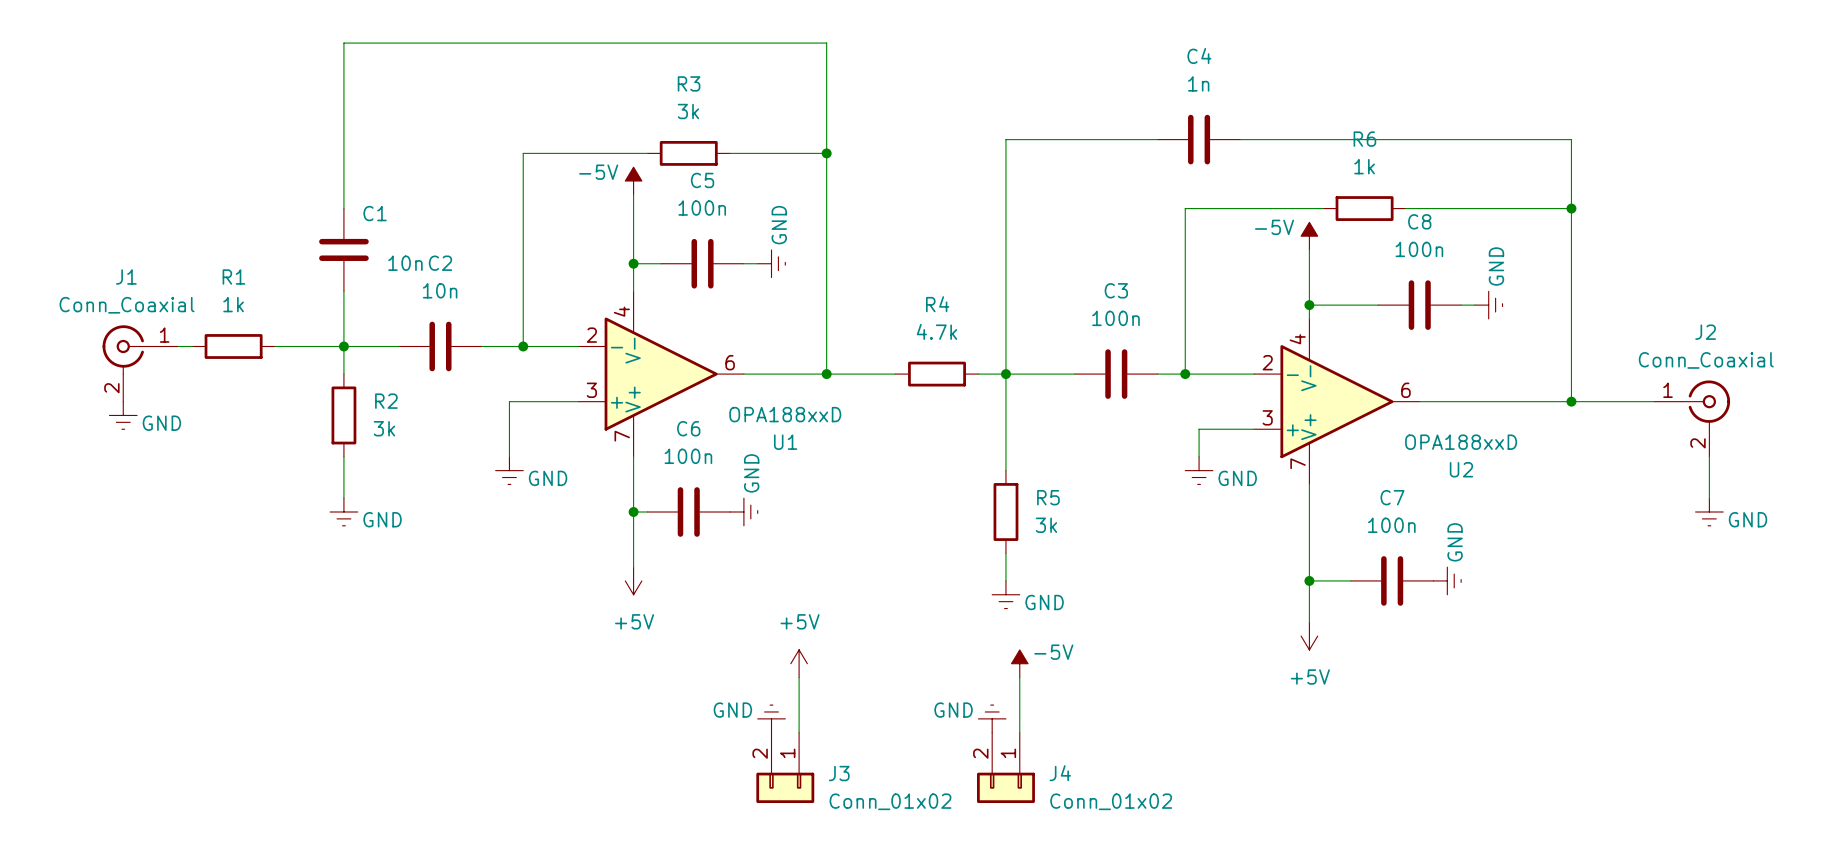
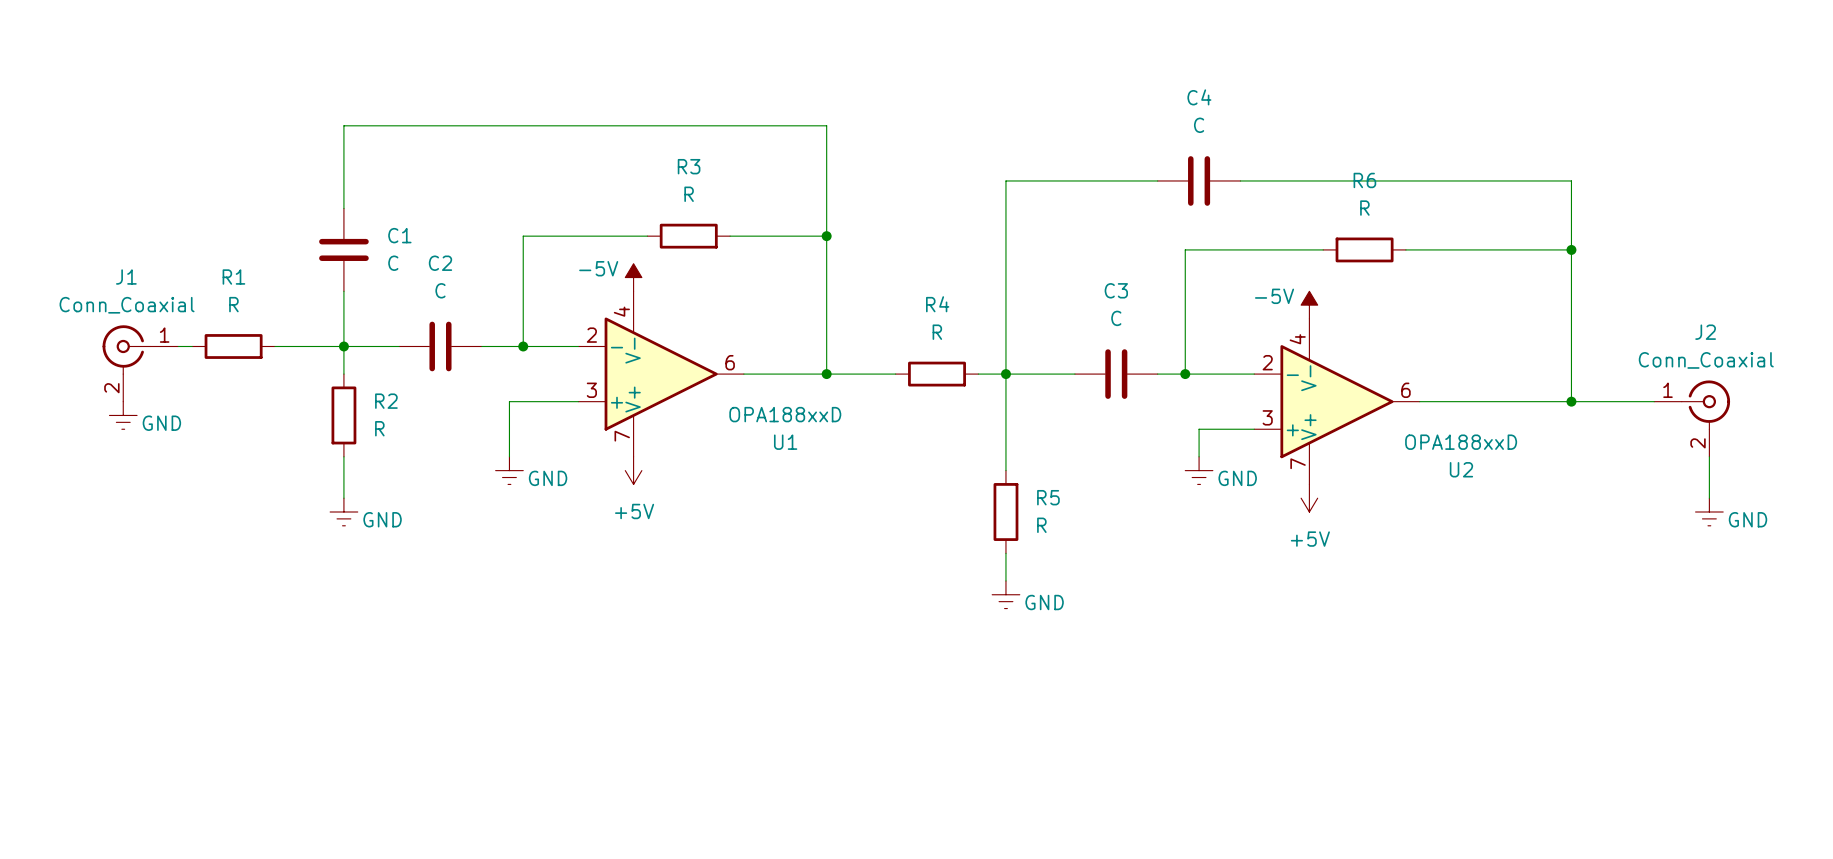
C4 value: 1n (1198, 83) -> C (1199, 125)
R3 value: 3k (688, 111) -> R (689, 194)
wire: (343, 125) (343, 43) (826, 43) (826, 125) -> (343, 125) (826, 125)
wire: (1157, 139) (1005, 139) (1005, 180) -> (1157, 180) (1005, 180)
C4 position: (1199, 139) -> (1199, 180)
wire: (1240, 139) (1571, 139) (1571, 180) -> (1240, 180) (1571, 180)
wire: (647, 153) (523, 153) (523, 236) -> (647, 236) (523, 236)
R3 position: (688, 153) -> (688, 236)
wire: (730, 153) (826, 153) -> (730, 236) (826, 236)
junction: (826, 153) -> none
R6 value: 1k (1364, 166) -> R (1364, 208)
power symbol position: -5V (633, 180) -> -5V (633, 277)
wire: (633, 194) (633, 291) -> none
wire: (1323, 208) (1185, 208) (1185, 249) -> (1323, 249) (1185, 249)
R6 position: (1364, 208) -> (1364, 249)
wire: (1405, 208) (1571, 208) -> (1405, 249) (1571, 249)
junction position: (1571, 208) -> (1571, 249)
C1 name position: C1 (375, 213) -> C1 (399, 235)
junction: none -> (826, 236)
power symbol position: -5V (1309, 236) -> -5V (1309, 305)
wire: (1309, 249) (1309, 318) -> none
C1 value: 10n (405, 263) -> C (393, 263)
wire: (633, 263) (661, 263) -> none
junction: (633, 263) -> none
C5: 100n (702, 263) -> none
wire: (743, 263) (757, 263) -> none
power symbol: GND (771, 263) -> none
C2 value: 10n (440, 290) -> C (440, 290)
R1 value: 1k (233, 304) -> R (233, 304)
wire: (1309, 305) (1378, 305) -> none
junction: (1309, 305) -> none
C8: 100n (1419, 305) -> none
wire: (1461, 305) (1474, 305) -> none
power symbol: GND (1488, 305) -> none
C3 value: 100n (1115, 318) -> C (1116, 318)
R4 value: 4.7k (937, 331) -> R (937, 332)
R2 value: 3k (384, 428) -> R (379, 428)
wire: (633, 456) (633, 567) -> none
wire: (1309, 484) (1309, 622) -> none
wire: (633, 512) (647, 512) -> none
junction: (633, 512) -> none
C6: 100n (688, 512) -> none
power symbol: GND (743, 512) -> none
R5 value: 3k (1046, 525) -> R (1041, 525)
power symbol position: +5V (633, 580) -> +5V (633, 470)
wire: (1309, 580) (1350, 580) -> none
junction: (1309, 580) -> none
C7: 100n (1392, 580) -> none
power symbol: GND (1447, 580) -> none
power symbol position: +5V (1309, 636) -> +5V (1309, 498)
power symbol: +5V (799, 663) -> none
power symbol: -5V (1019, 663) -> none
wire: (799, 677) (799, 732) -> none
wire: (1019, 677) (1019, 732) -> none
power symbol: GND (771, 718) -> none
power symbol: GND (992, 718) -> none
J3: Conn_01x02 (785, 767) -> none
J4: Conn_01x02 (1005, 767) -> none

